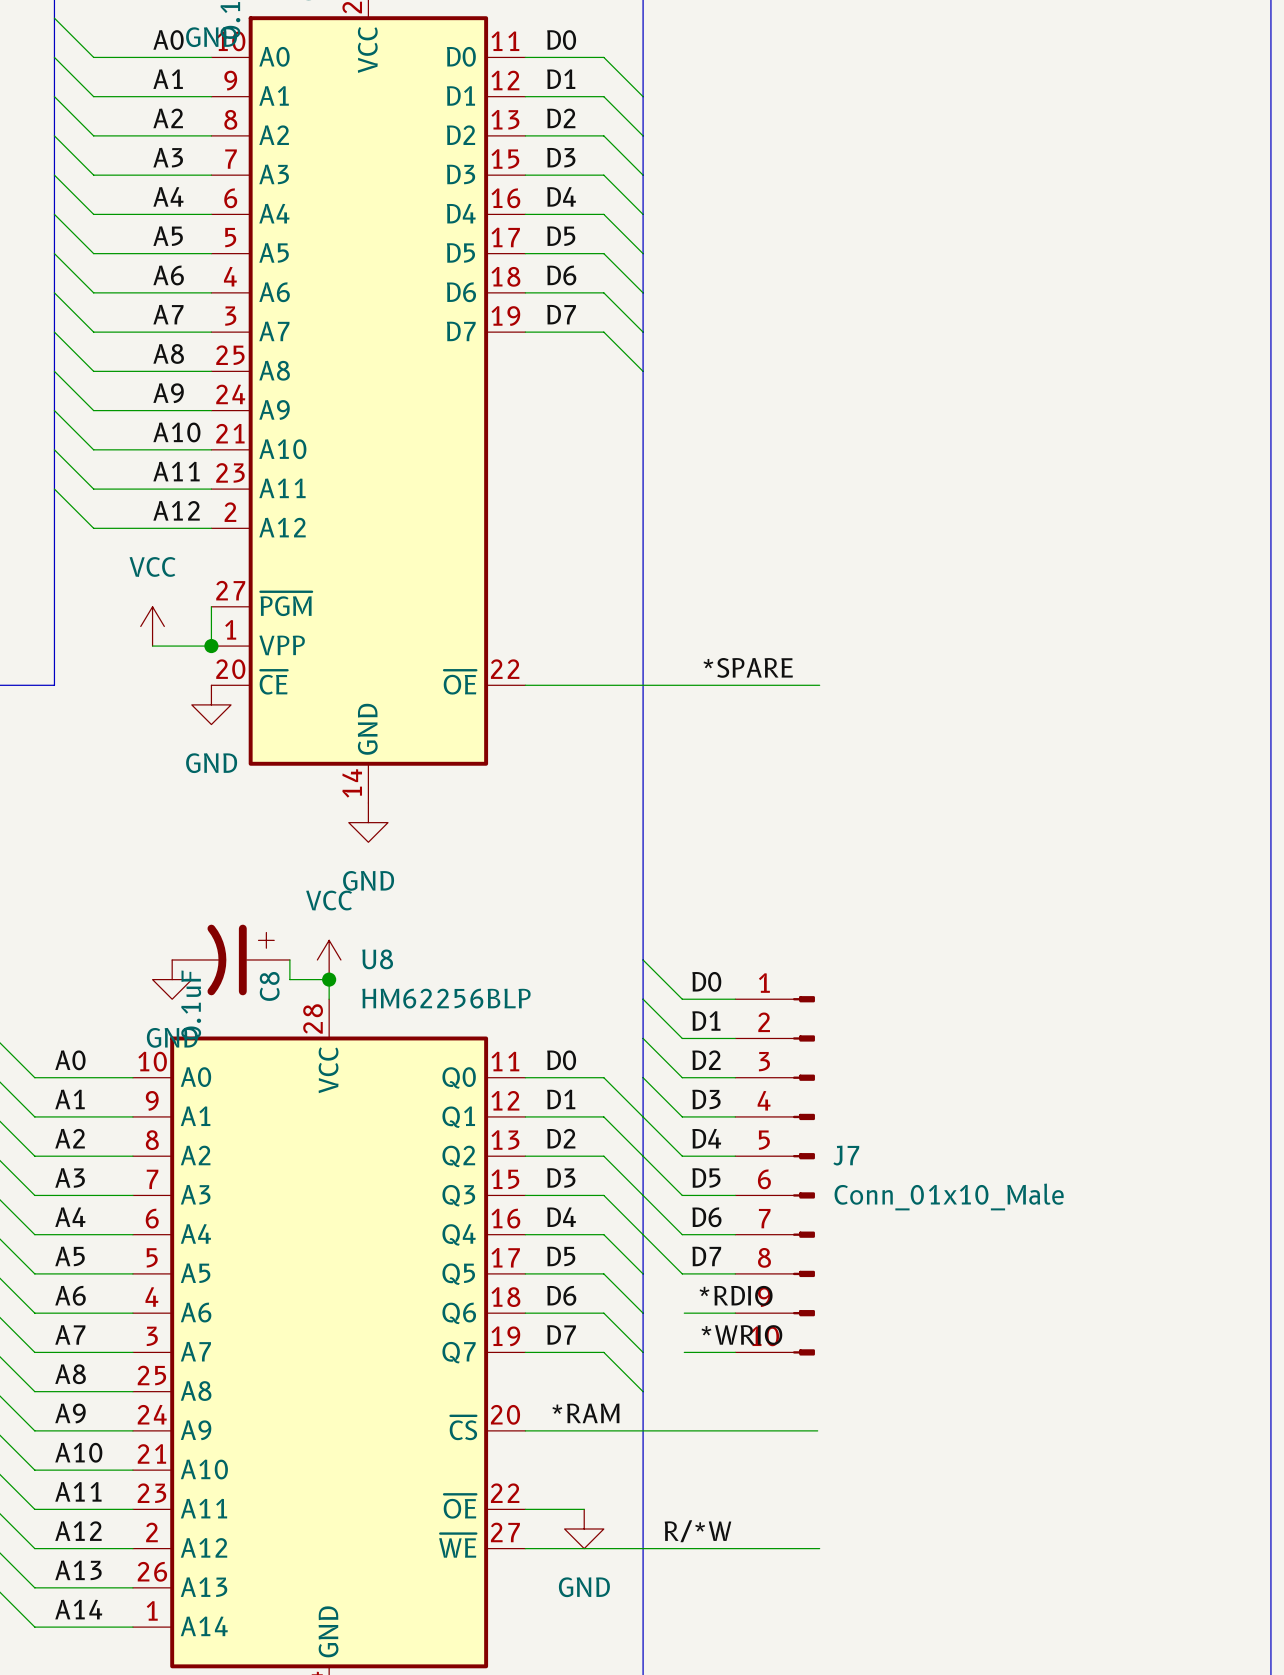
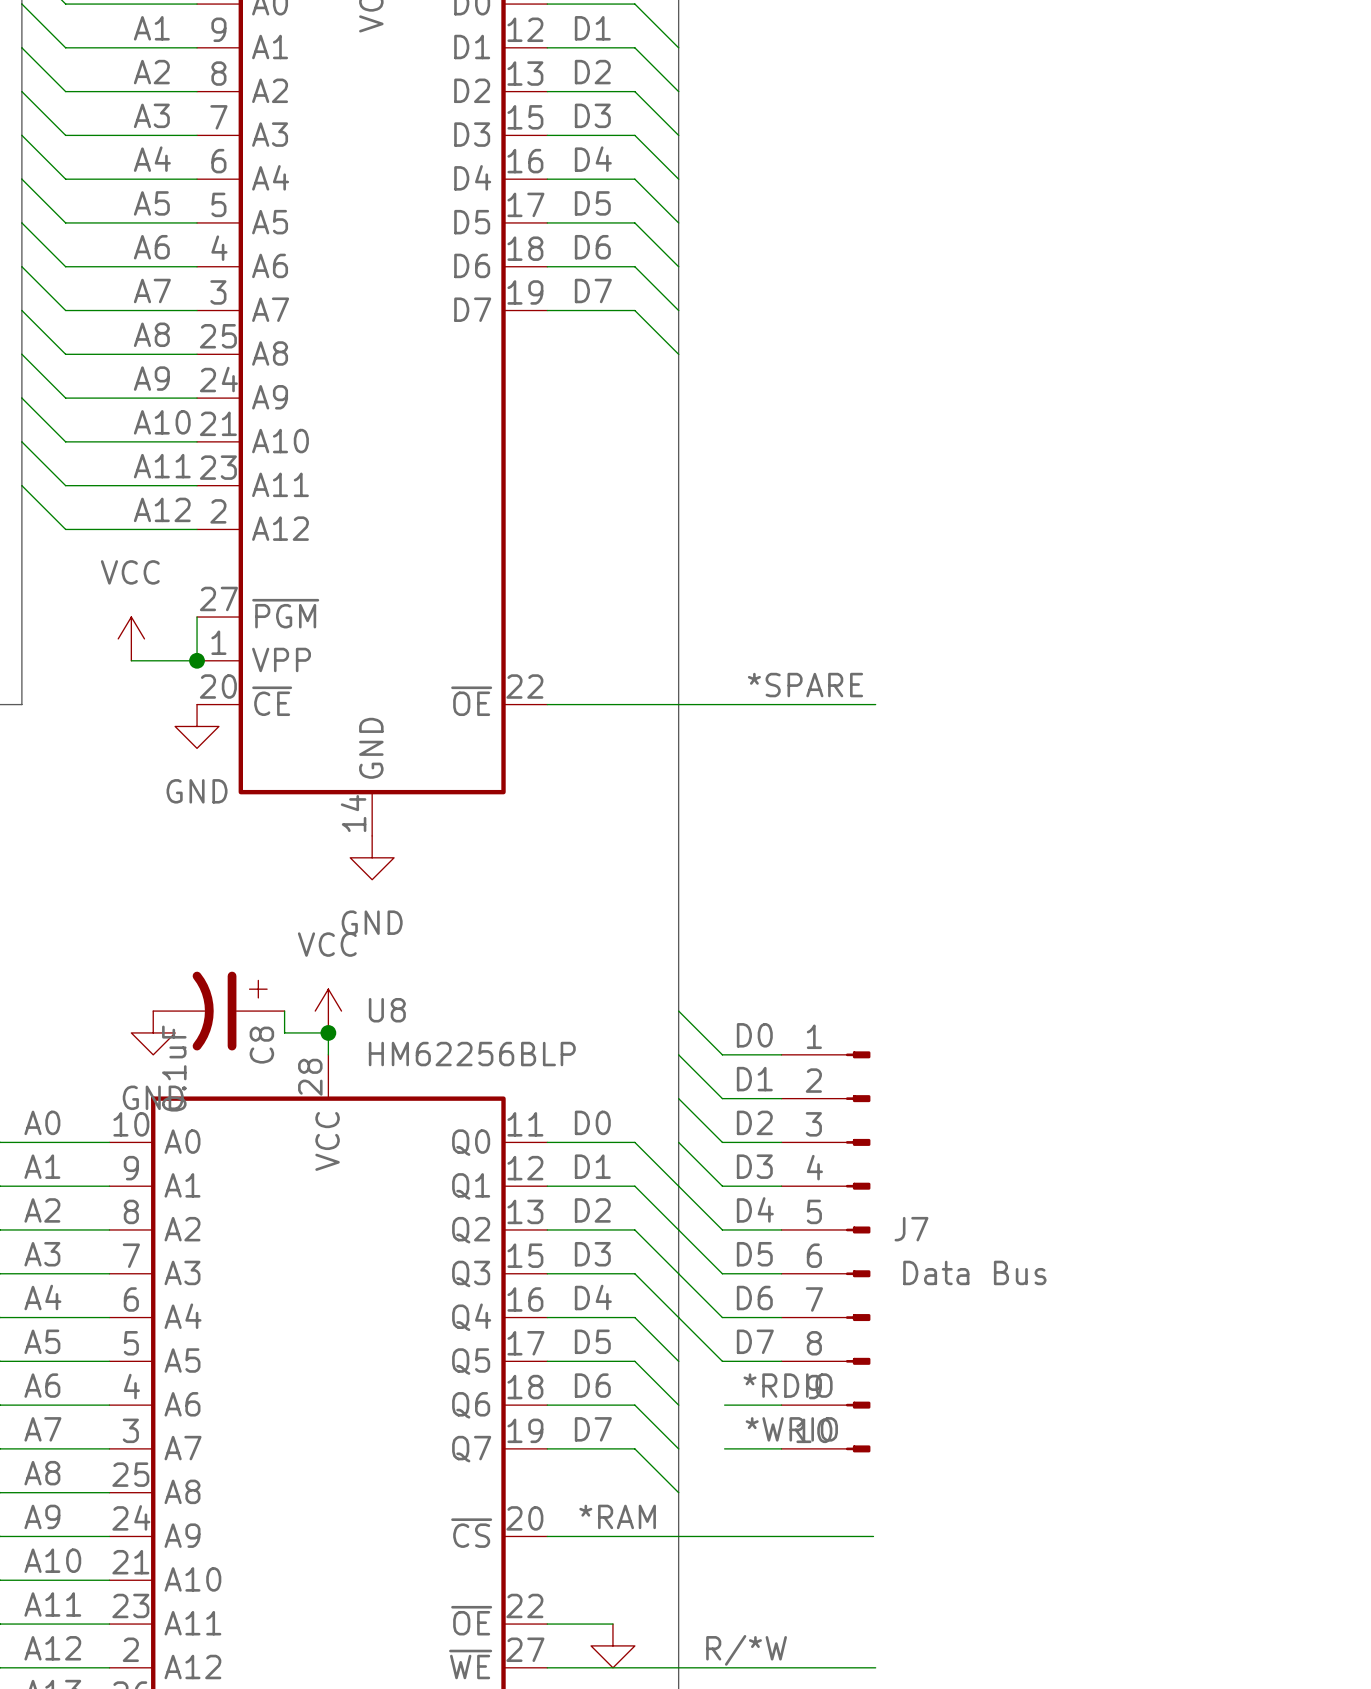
J7 value: Conn_01x10_Male (949, 1196) -> Data Bus (974, 1272)

